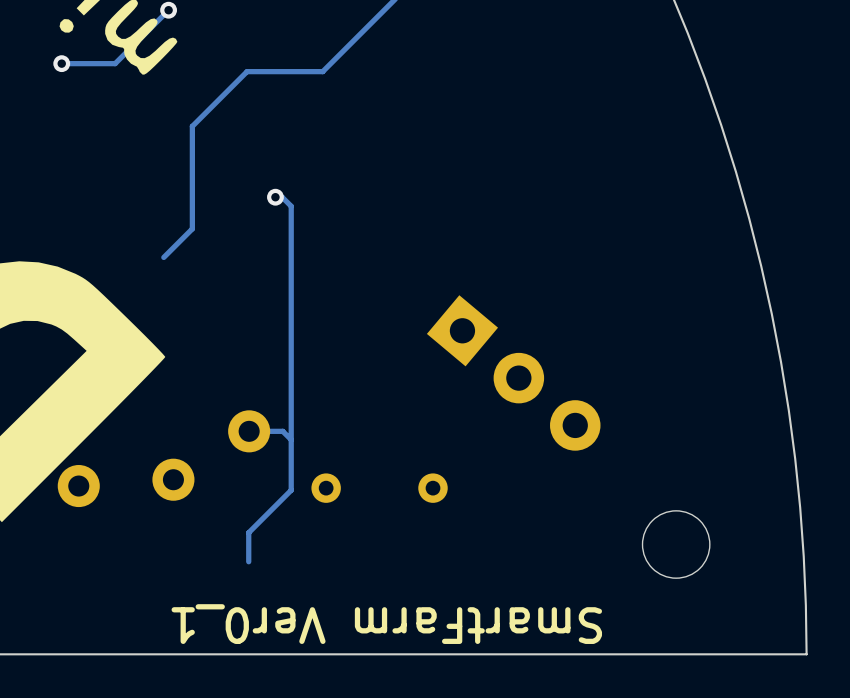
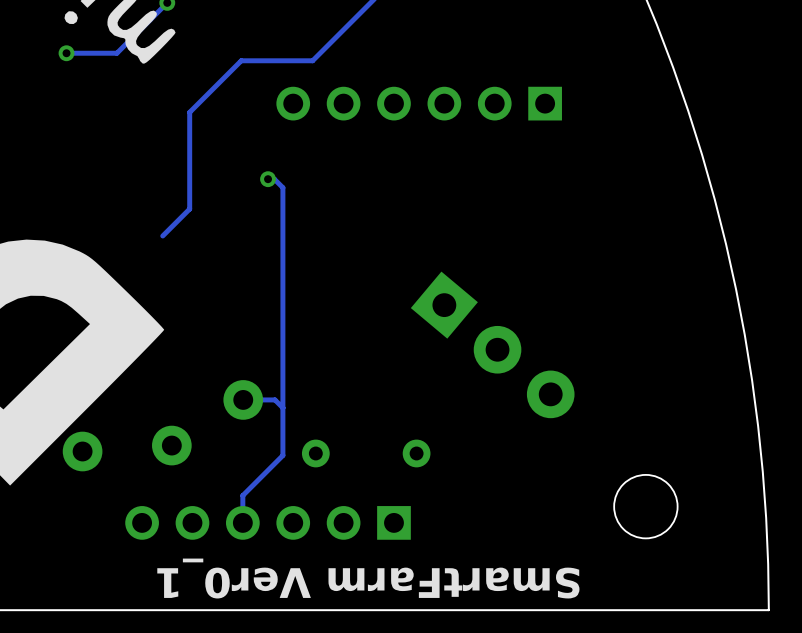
part: none -> (419, 103)
part: none -> (268, 522)

